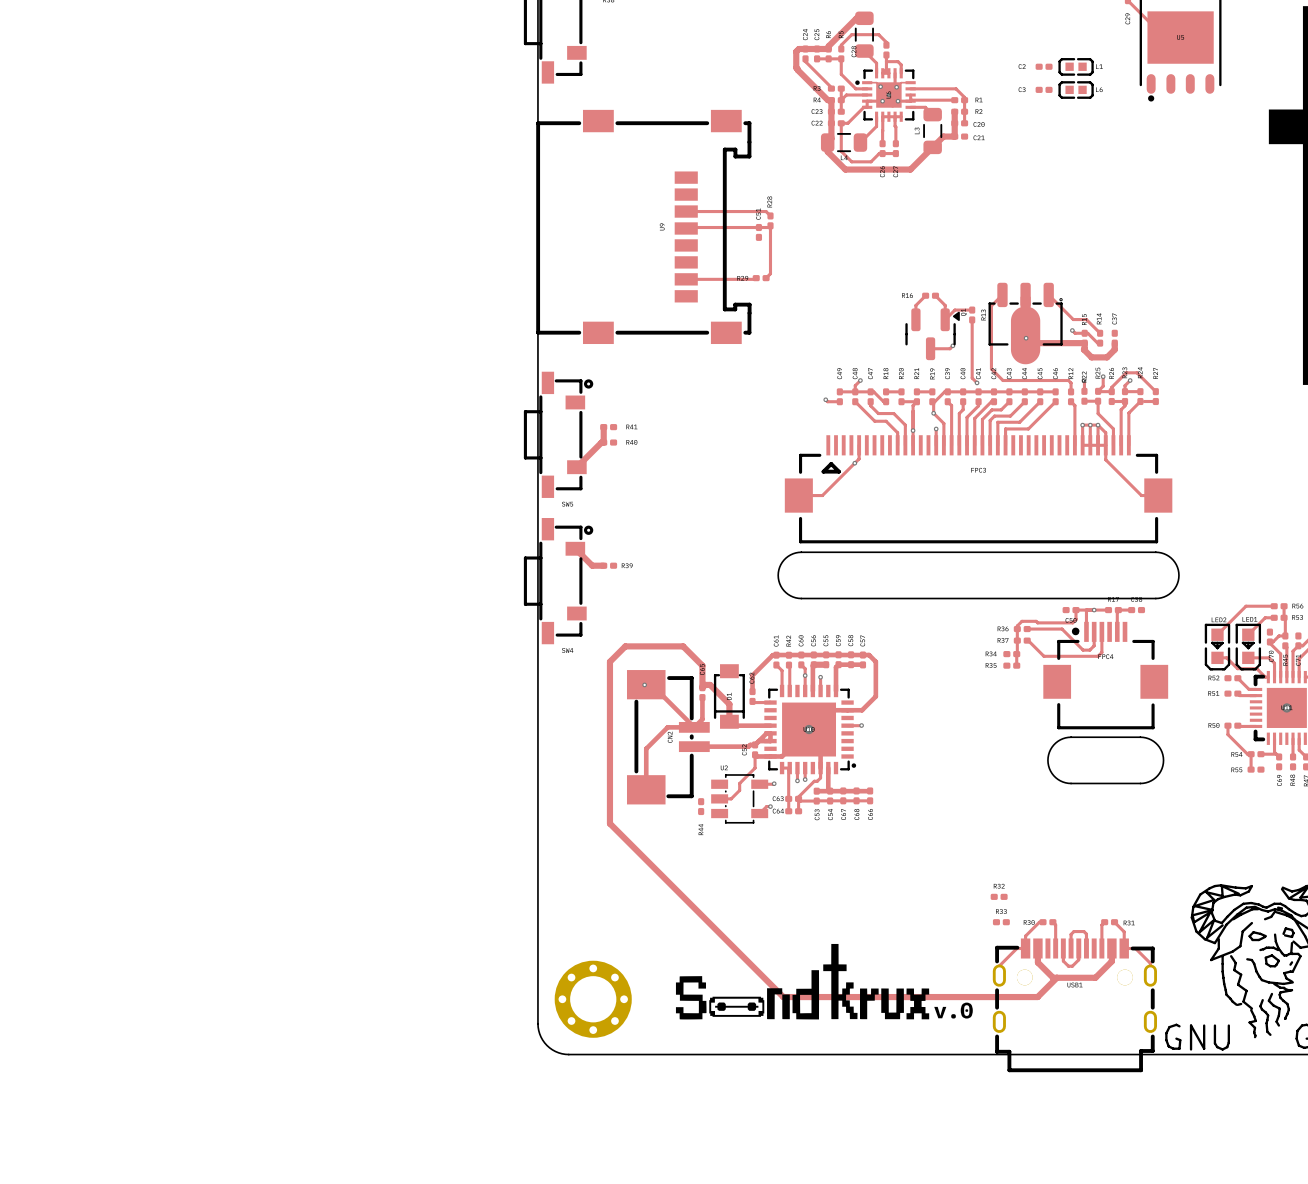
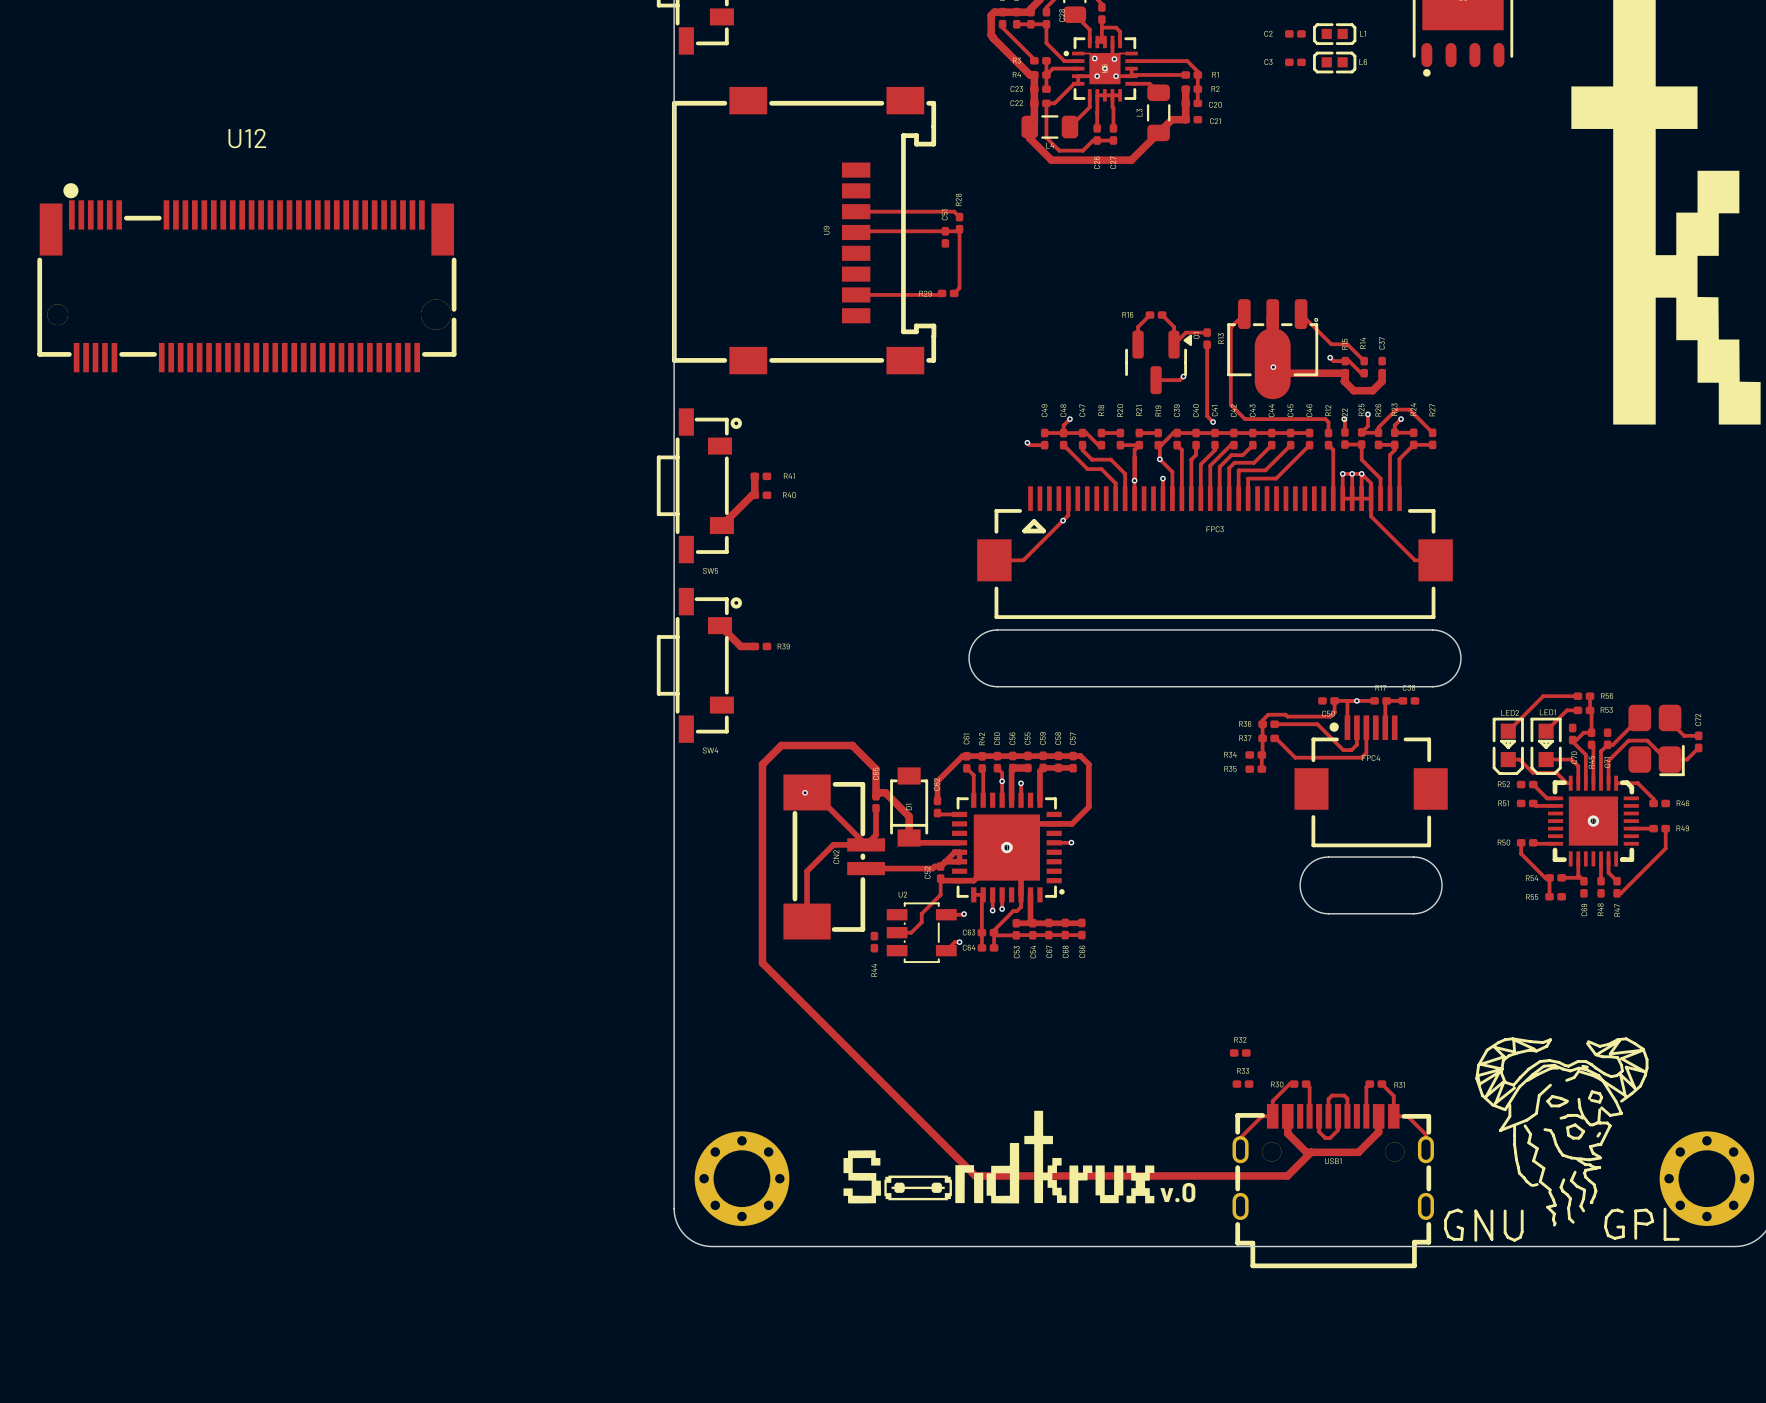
U12: none -> (246, 277)

